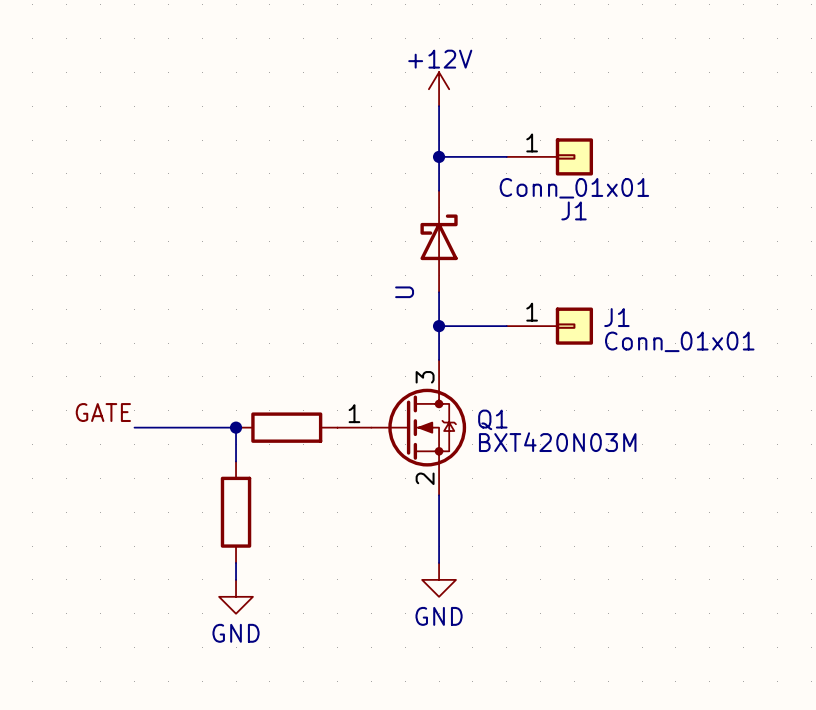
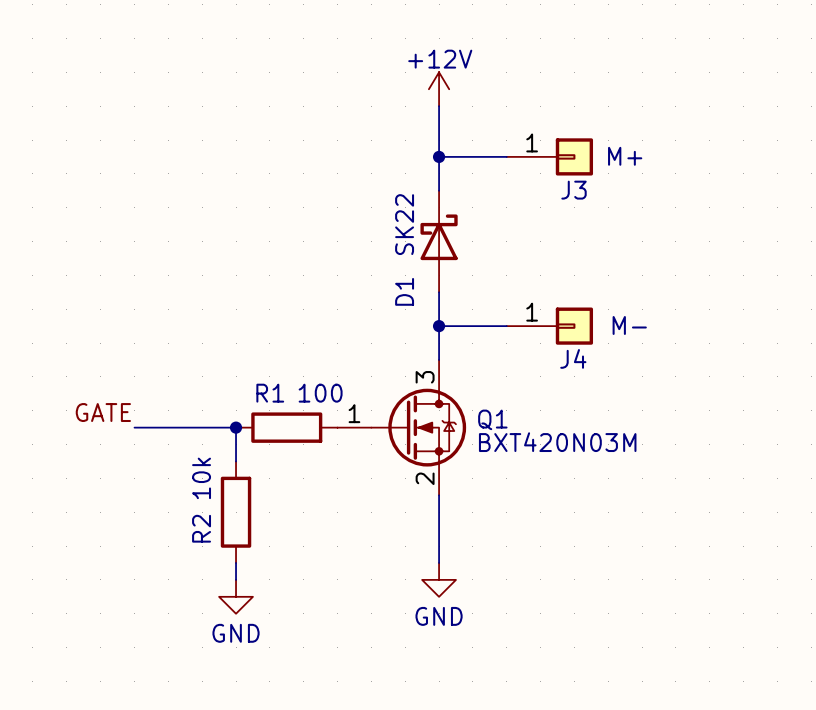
J1 value: Conn_01x01 (574, 188) -> M+ (625, 156)
J1 name: J1 (574, 210) -> J3 (574, 190)
U value: none -> SK22 (404, 224)
U name: U (404, 292) -> D1 (404, 291)
J1 name: J1 (616, 317) -> J4 (573, 358)
J1 value: Conn_01x01 (679, 341) -> M- (629, 325)
R1 name: none -> R1 (270, 393)
R1 value: none -> 100 (320, 393)
R2 value: none -> 10k (201, 478)
R2 name: none -> R2 (201, 528)

